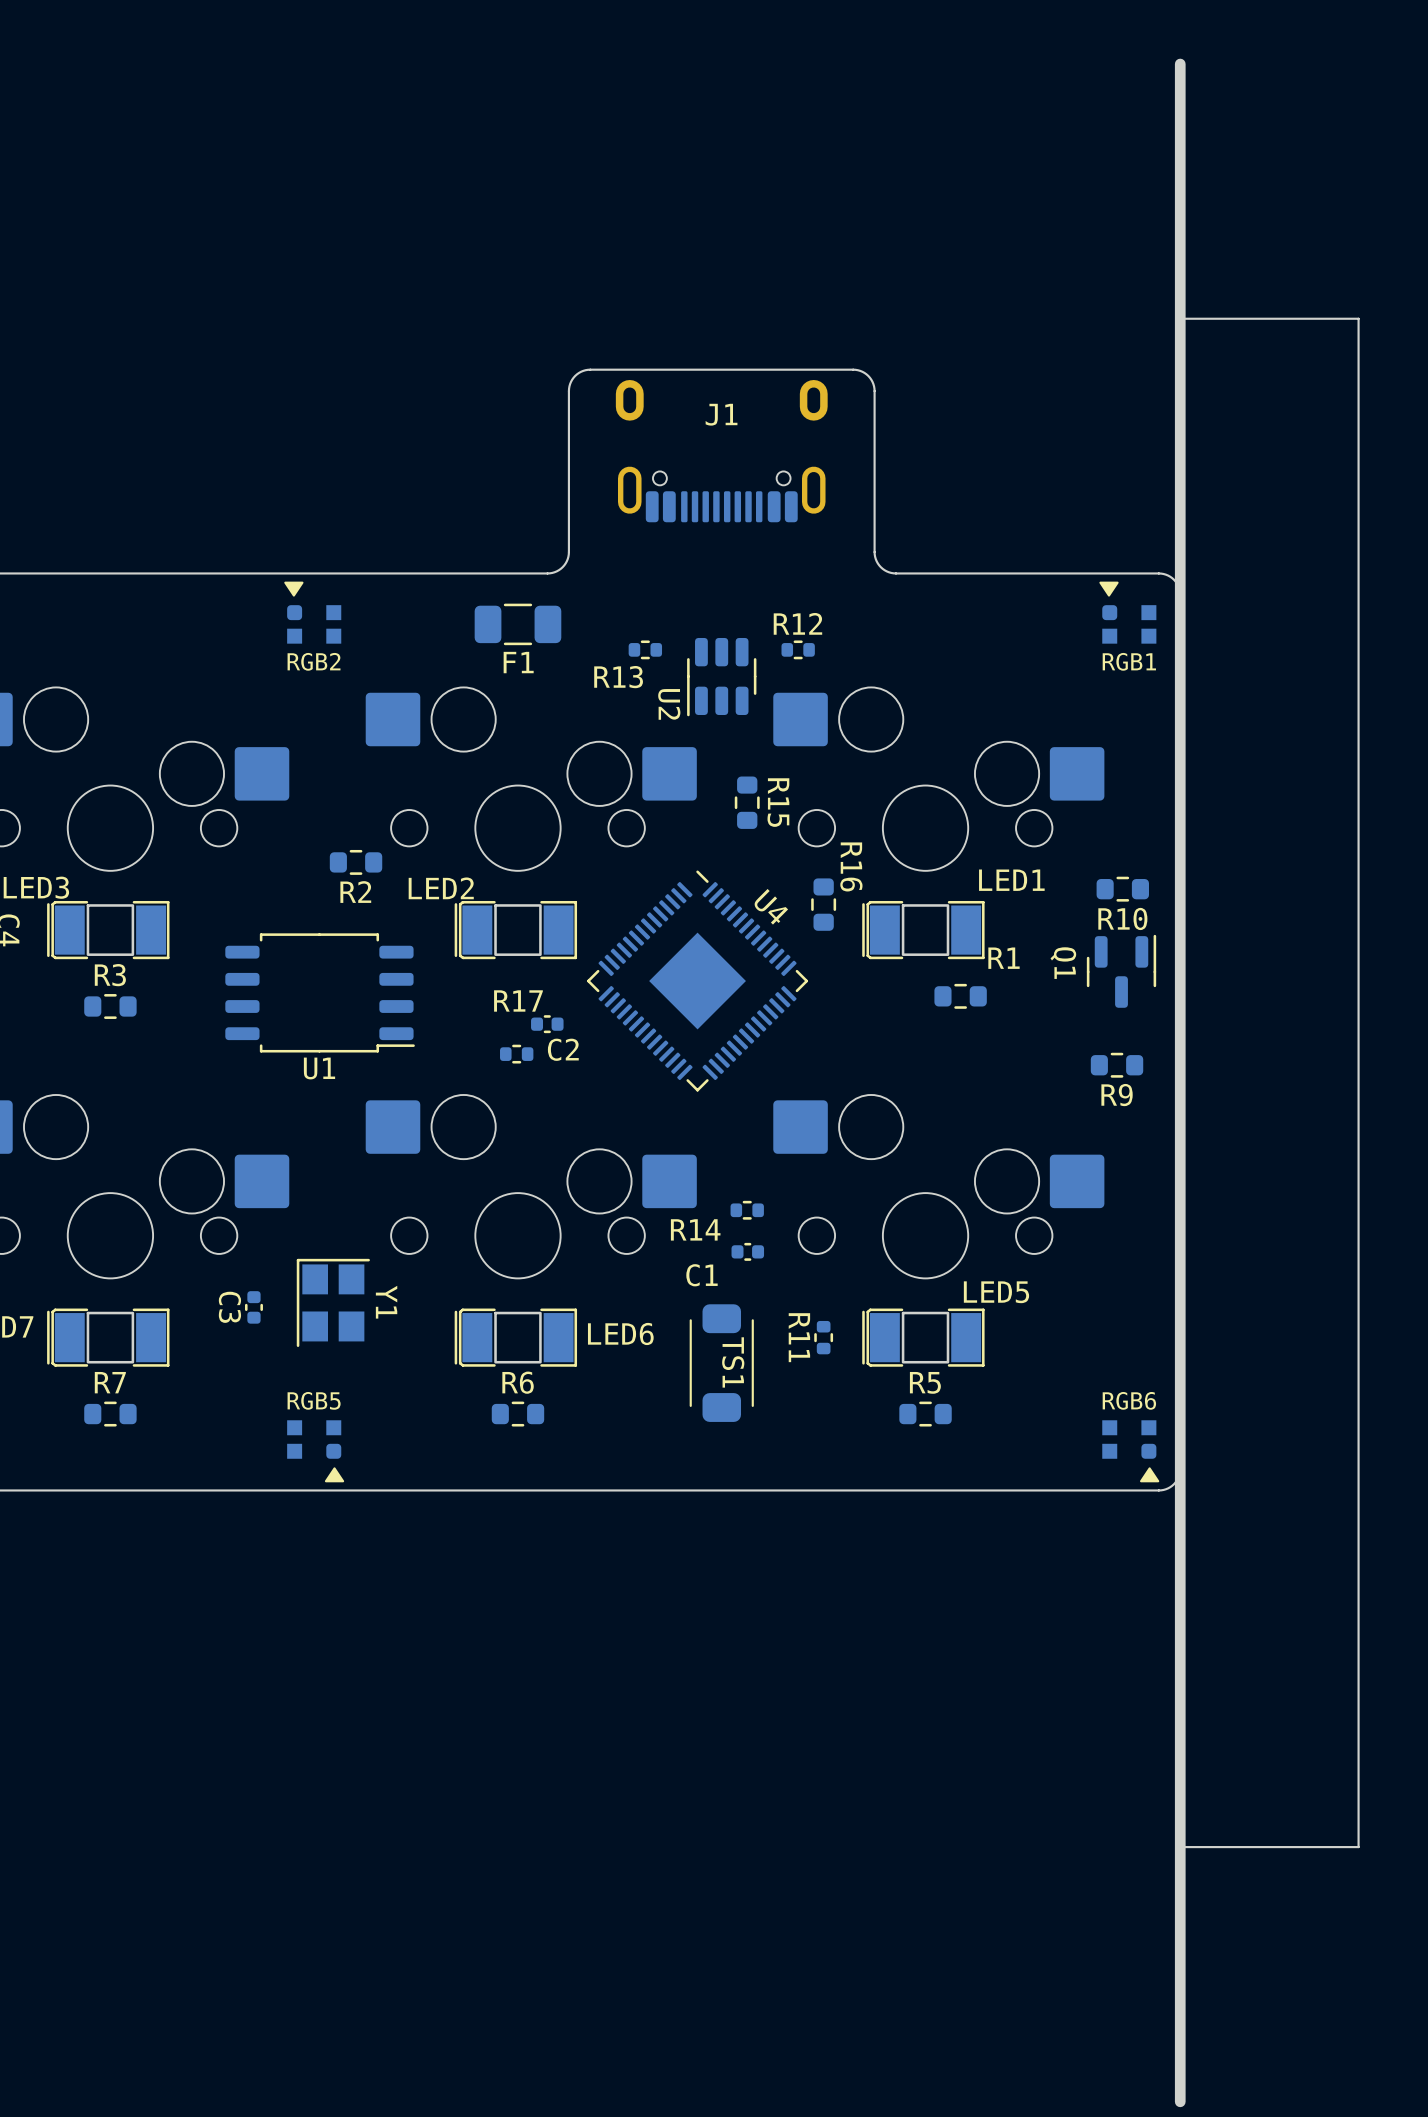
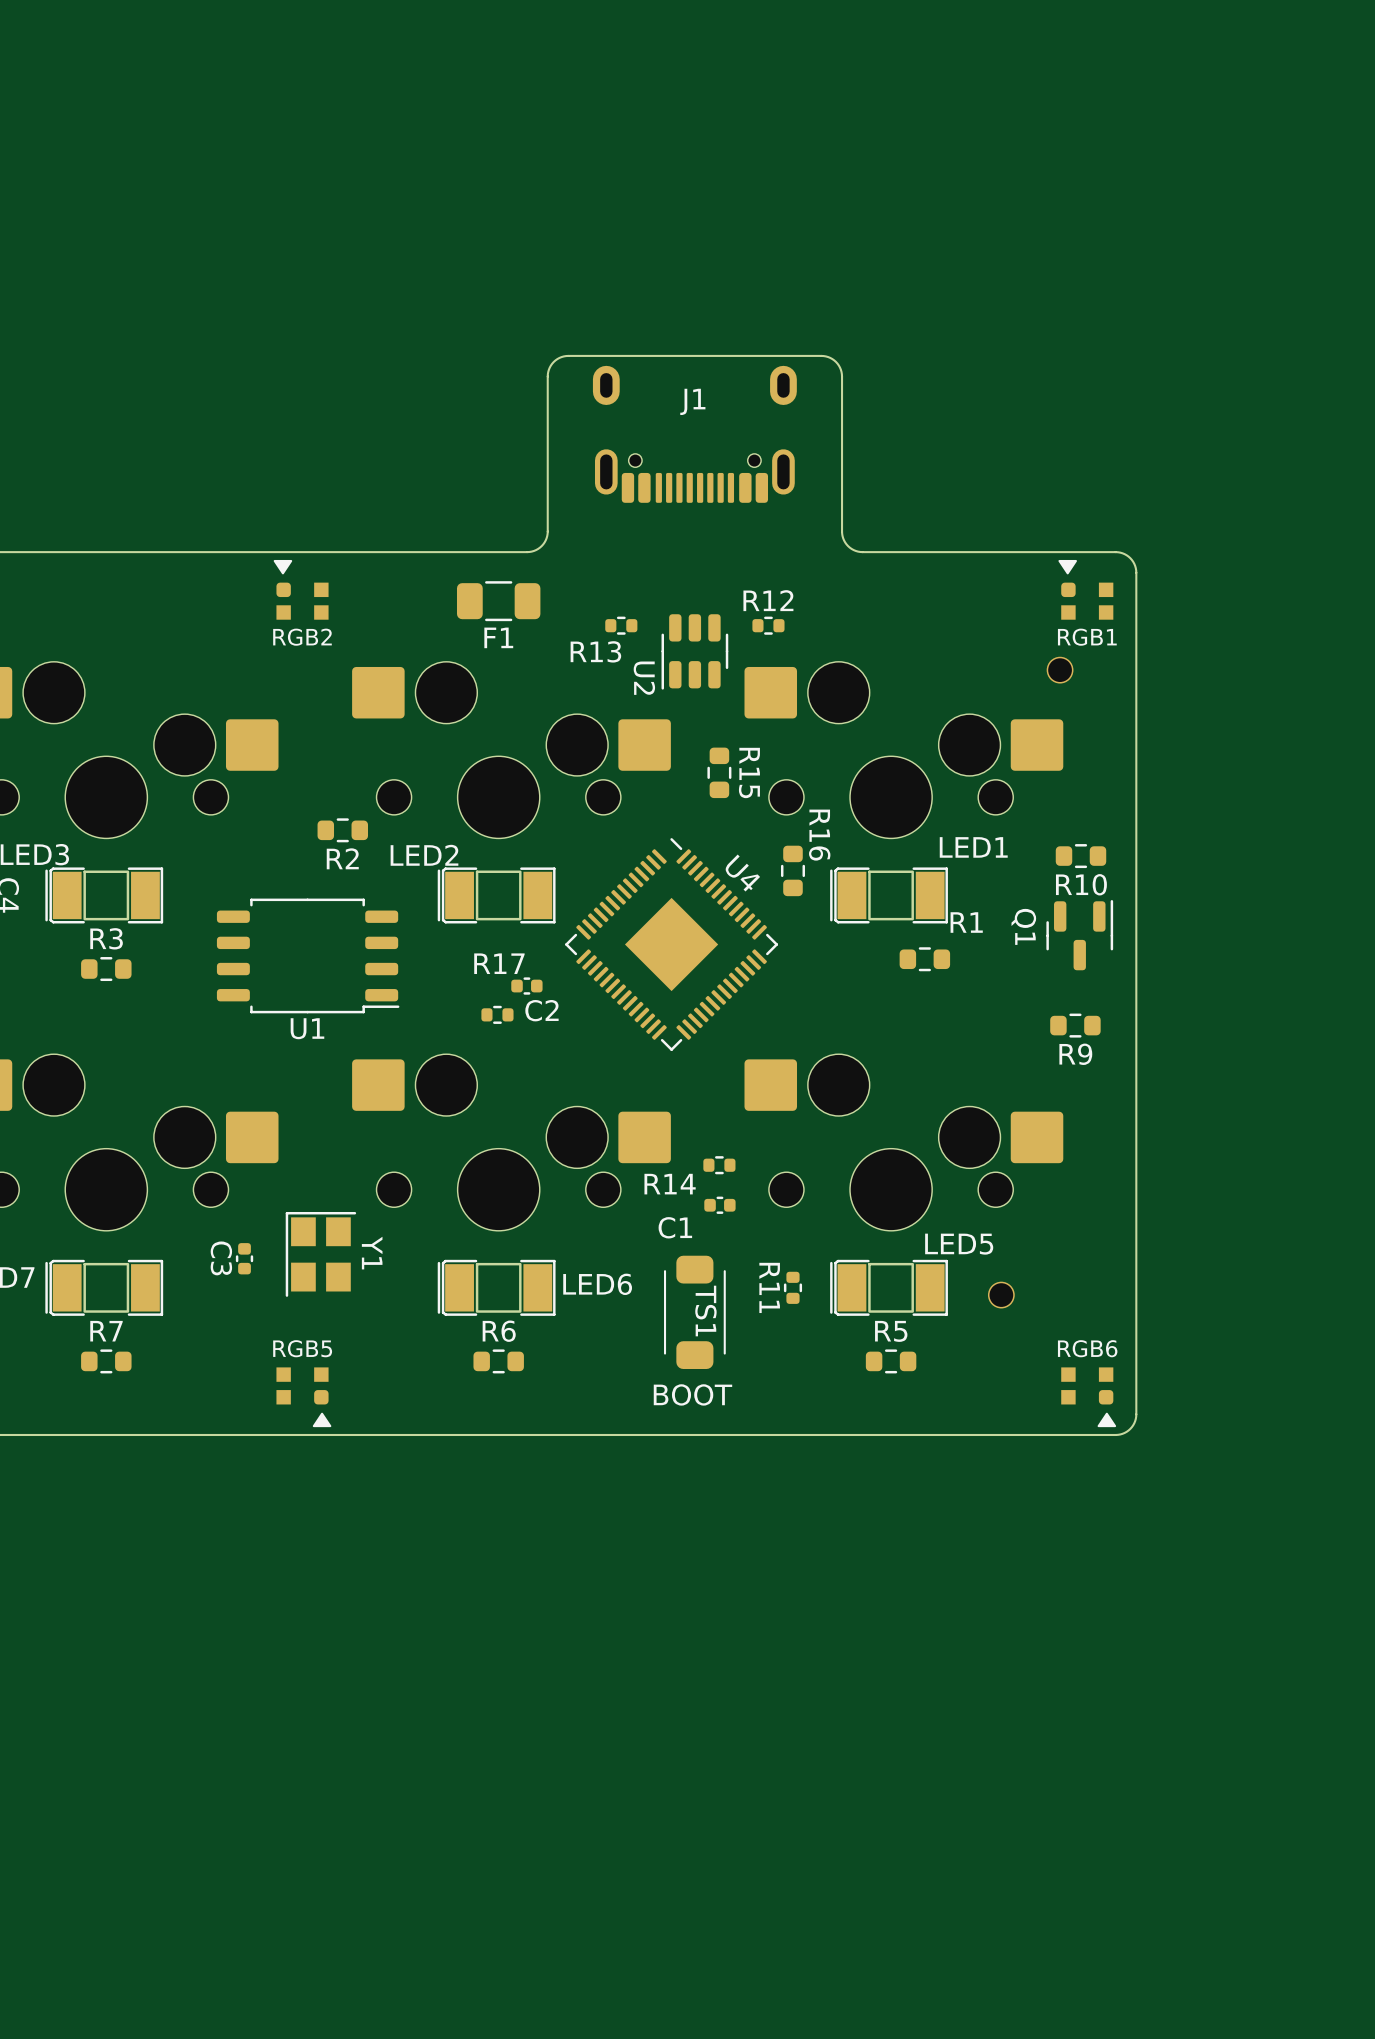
board edge: (1180, 64) (1180, 594) (1180, 318) (1358, 318) (1358, 1847) (1180, 1847) (1180, 1469) (1180, 2101) -> none
board edge width: thick (1180, 594) (1180, 1469) -> thin (1136, 572) (1136, 1414)
part: none -> (1060, 670)
part: none -> (1001, 1295)
text: none -> BOOT (692, 1394)

